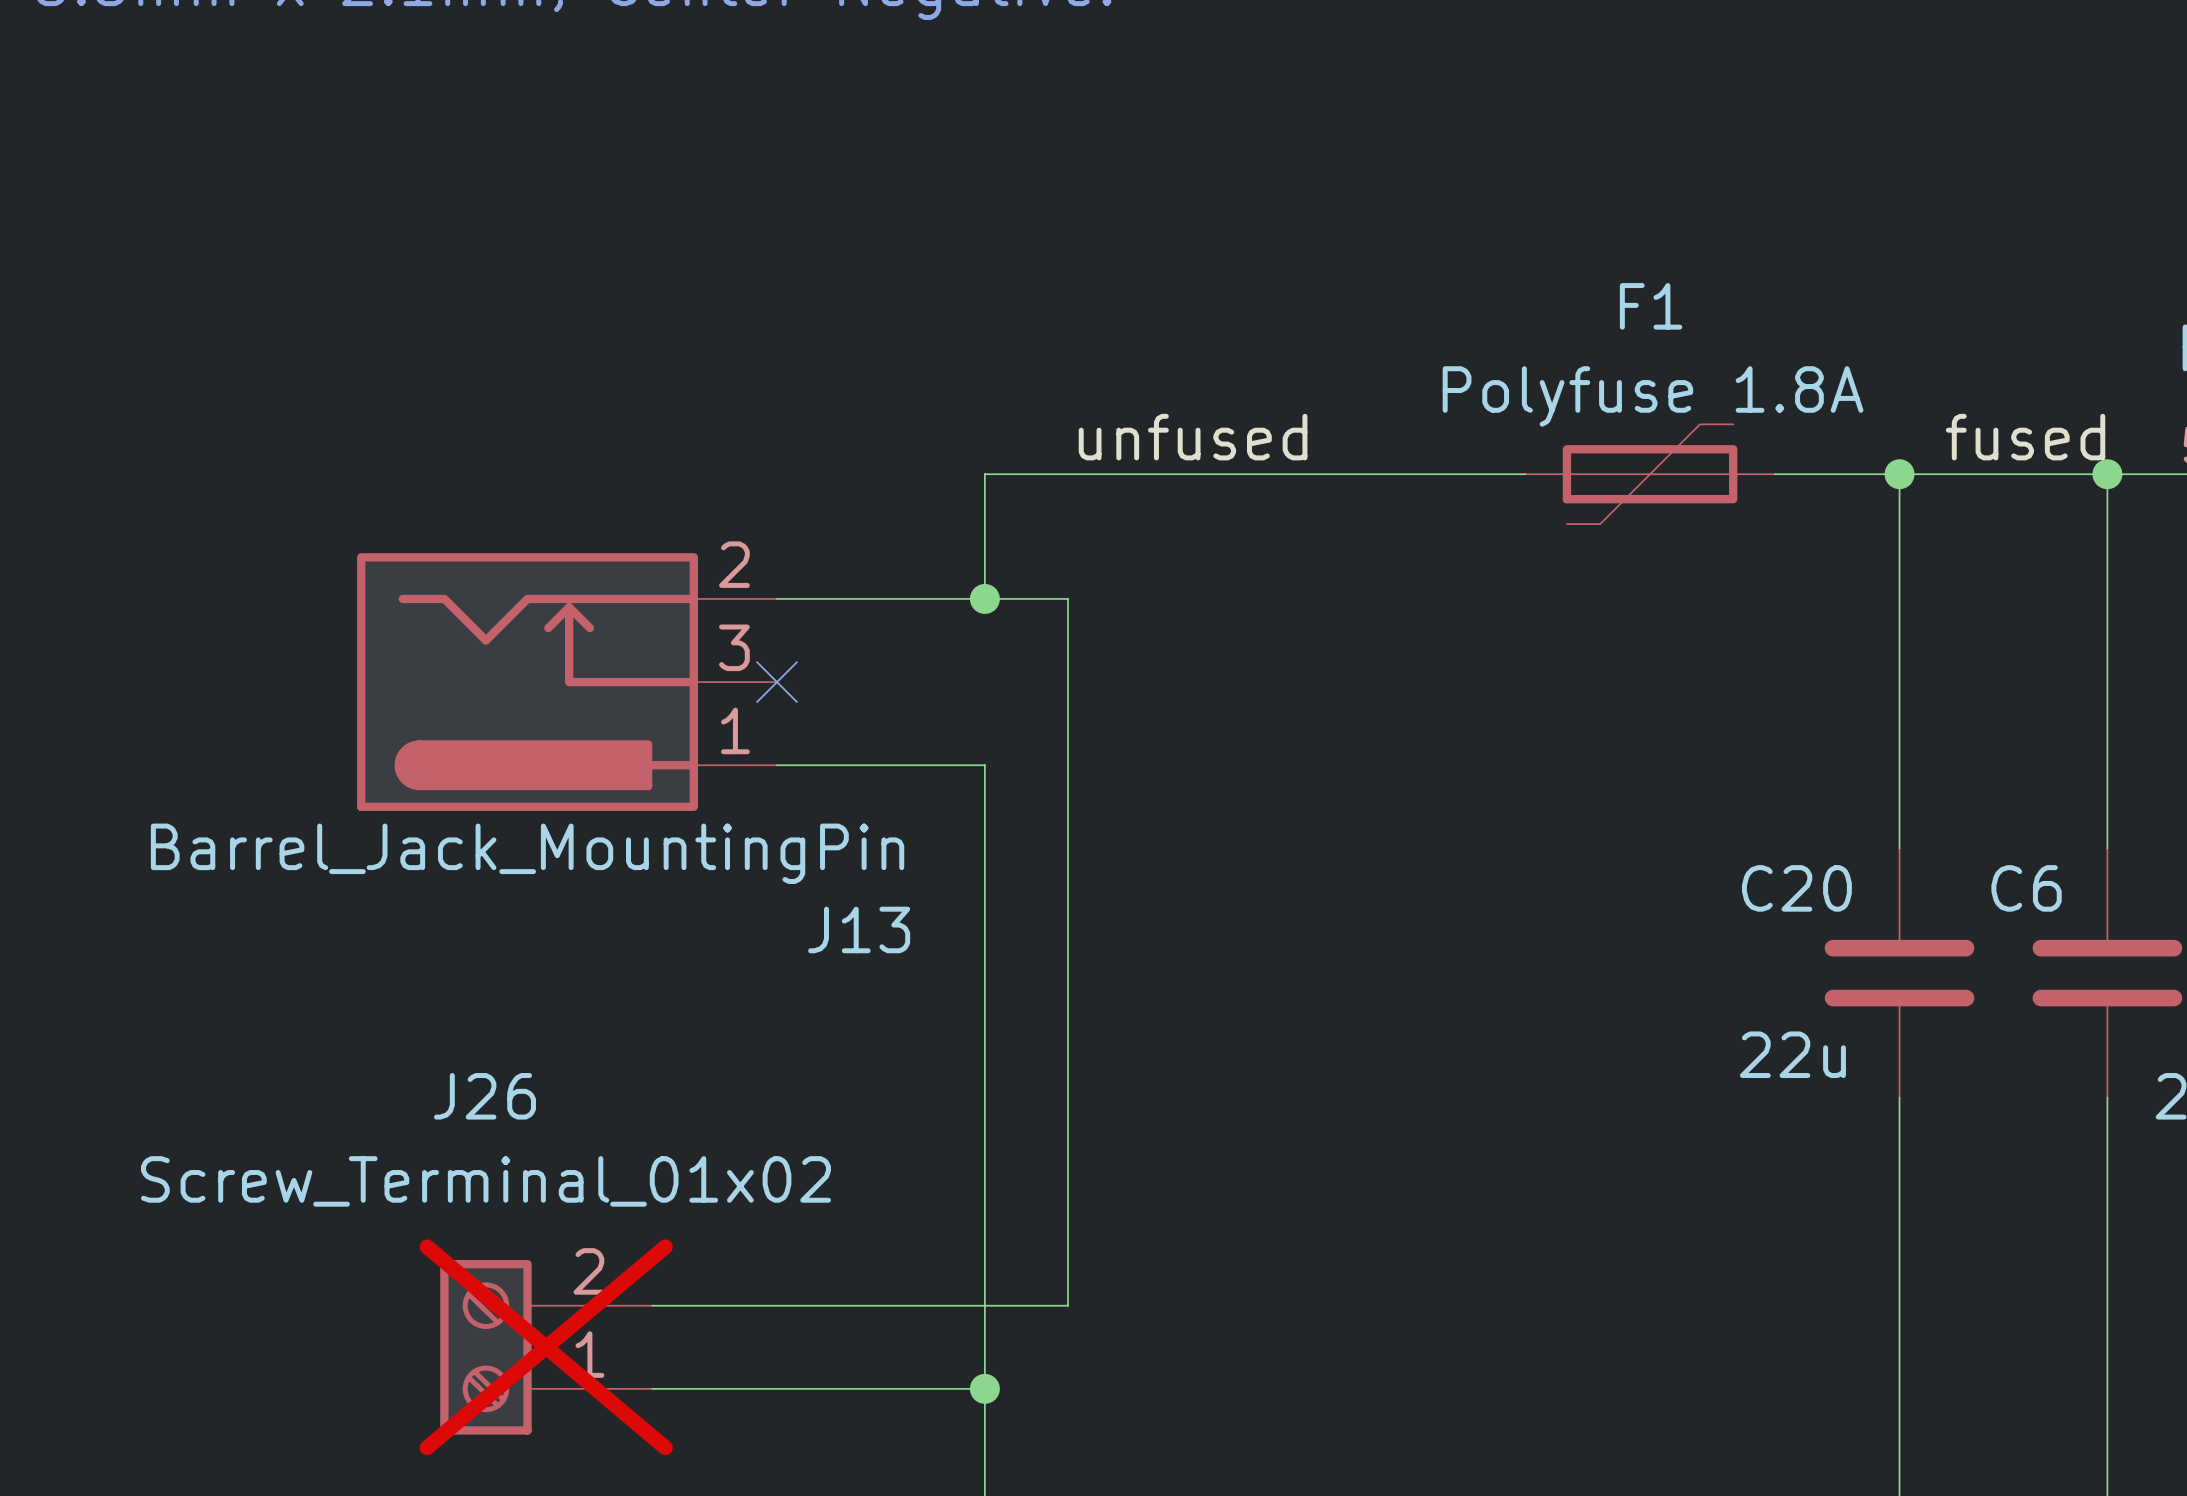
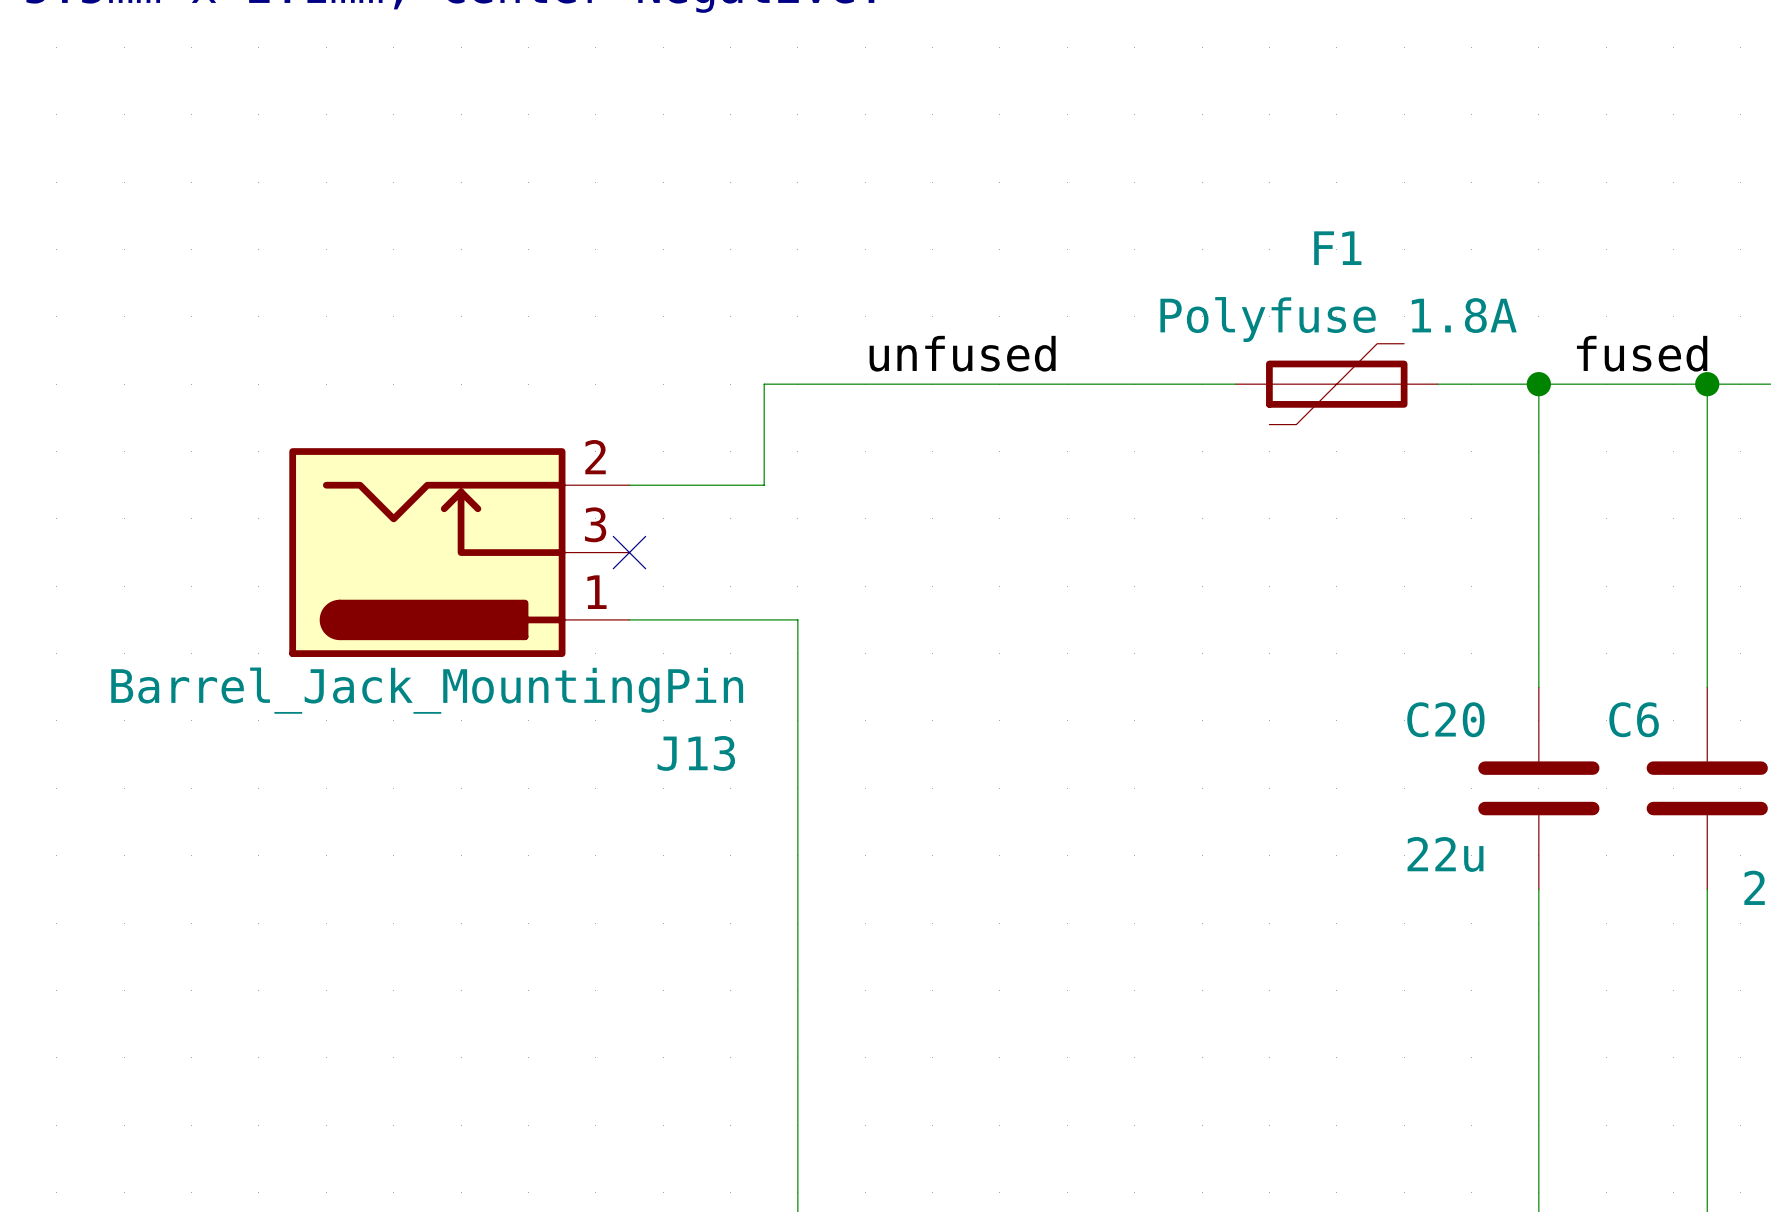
wire: (984, 474) (984, 598) -> (797, 384) (764, 384) (764, 485)
wire: (943, 598) (1068, 598) (1068, 1305) (652, 1305) -> none
junction: (984, 598) -> none
J26: Screw_Terminal_01x02 (546, 1347) -> none
wire: (652, 1388) (984, 1388) -> none
junction: (984, 1388) -> none

